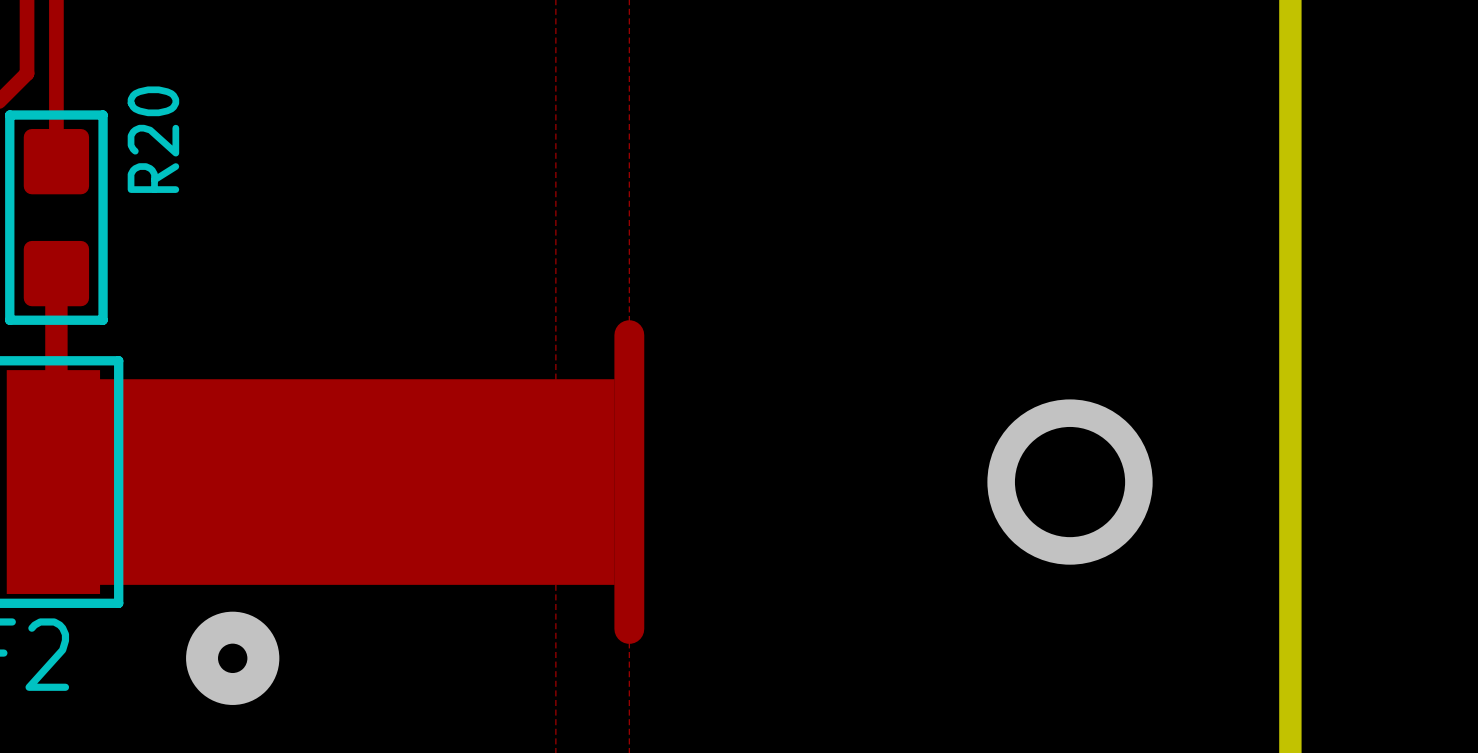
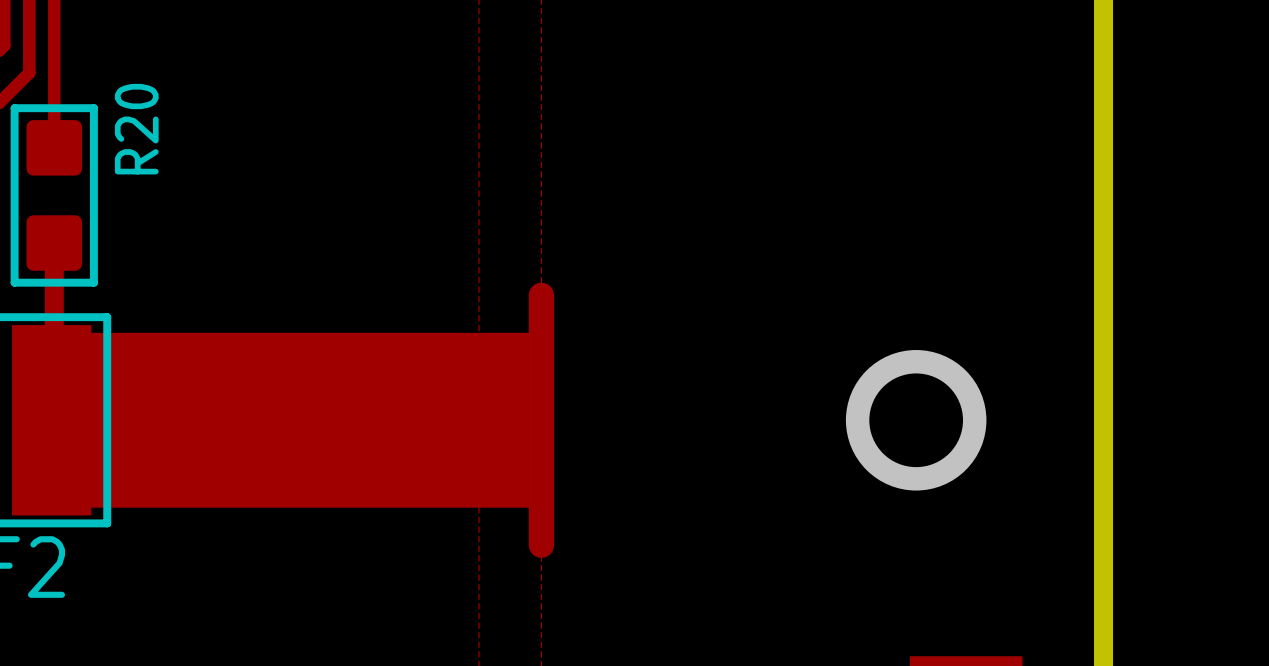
via: (232, 658) -> none

